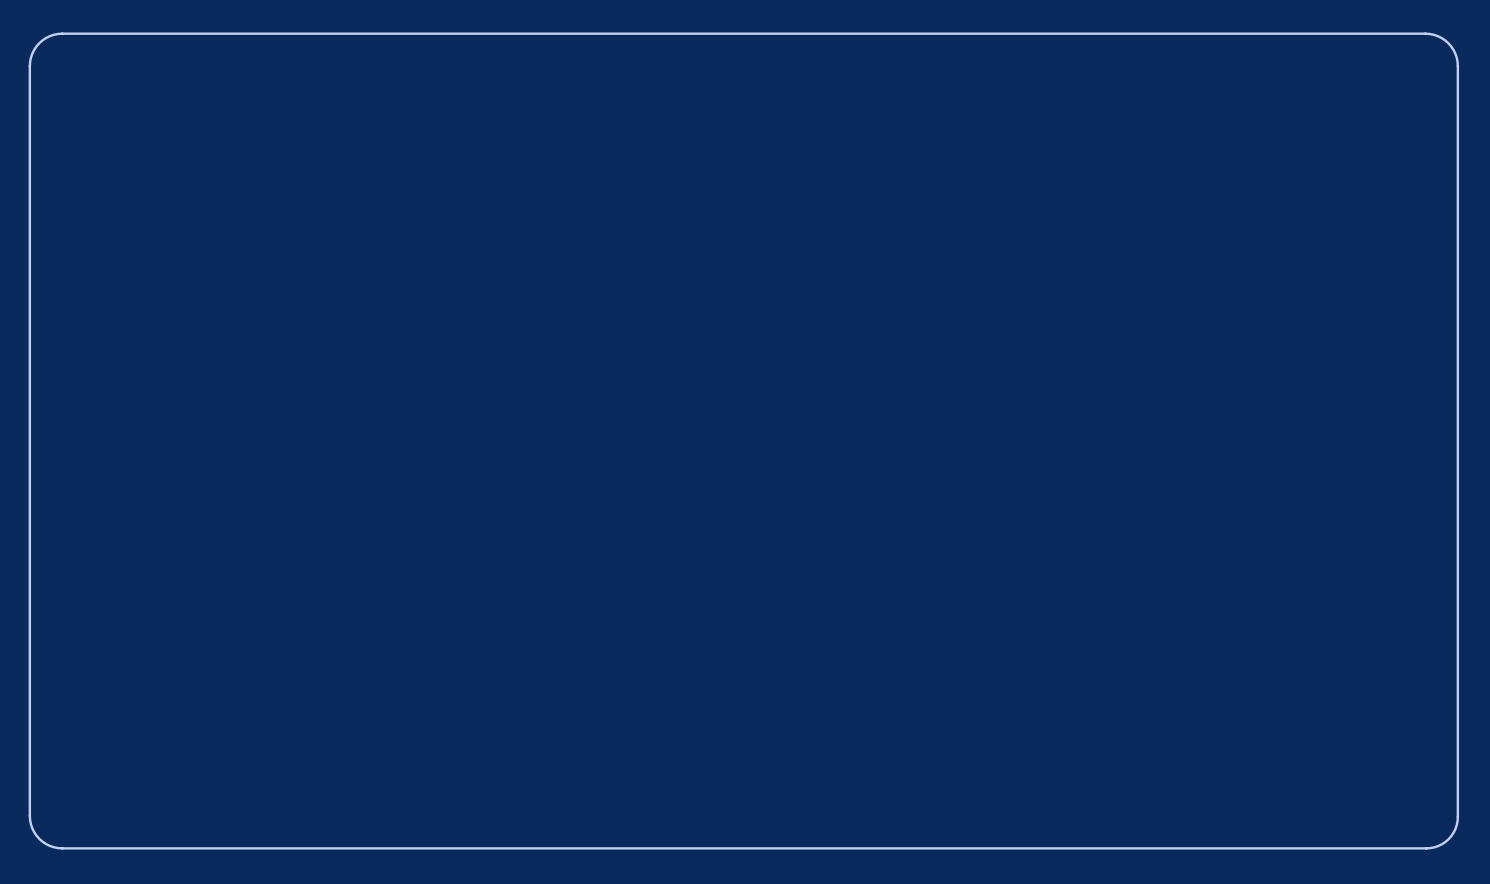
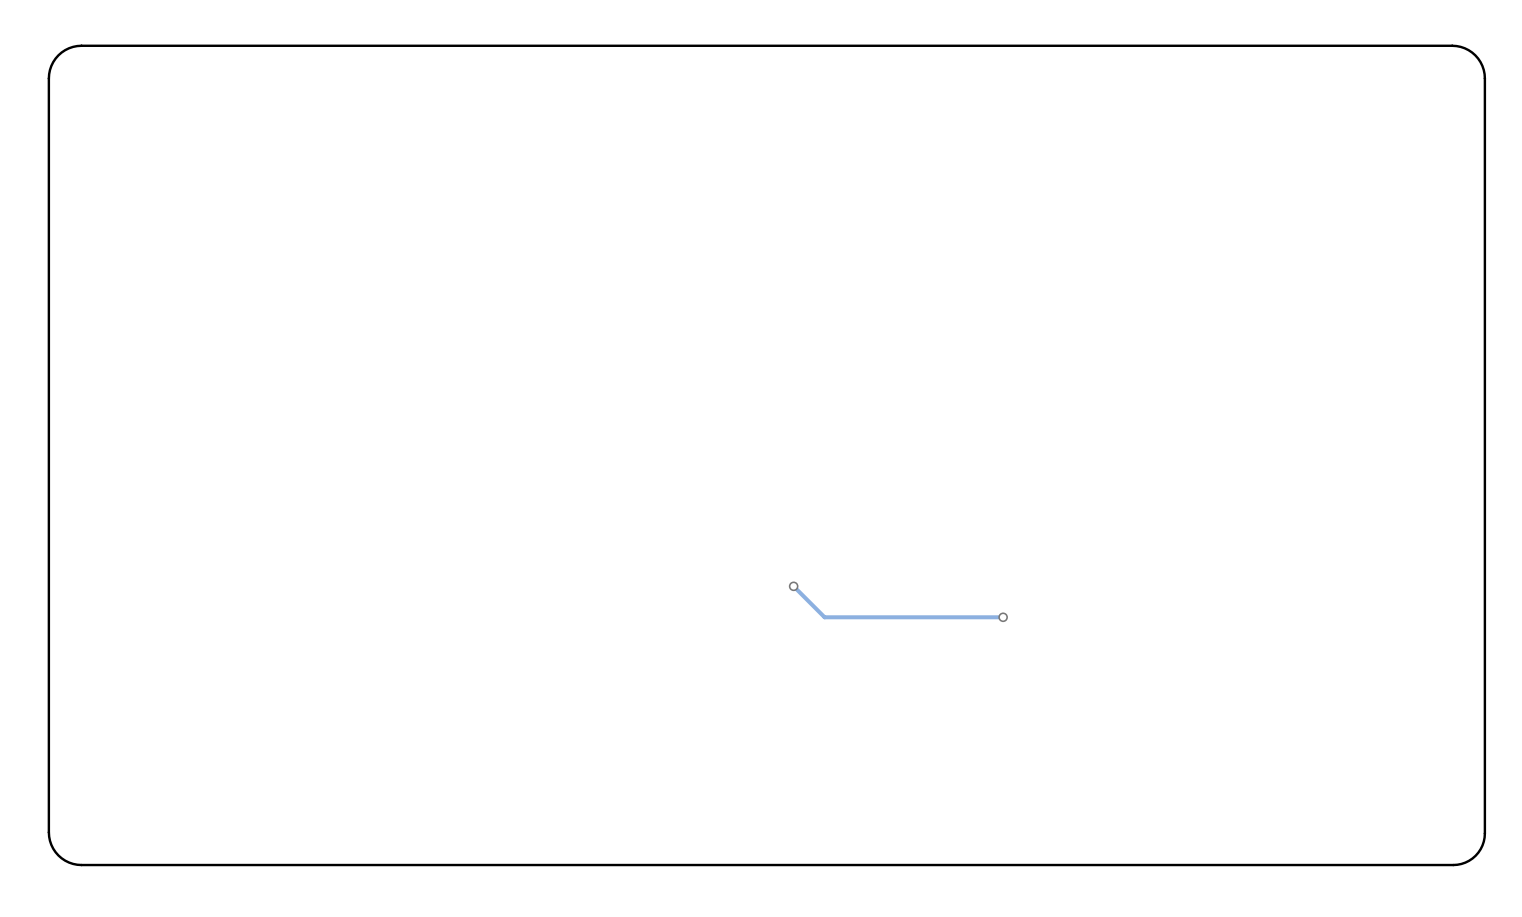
track: none -> (793, 586) (824, 617) (1003, 617)
via: none -> (793, 586)
via: none -> (1003, 617)

